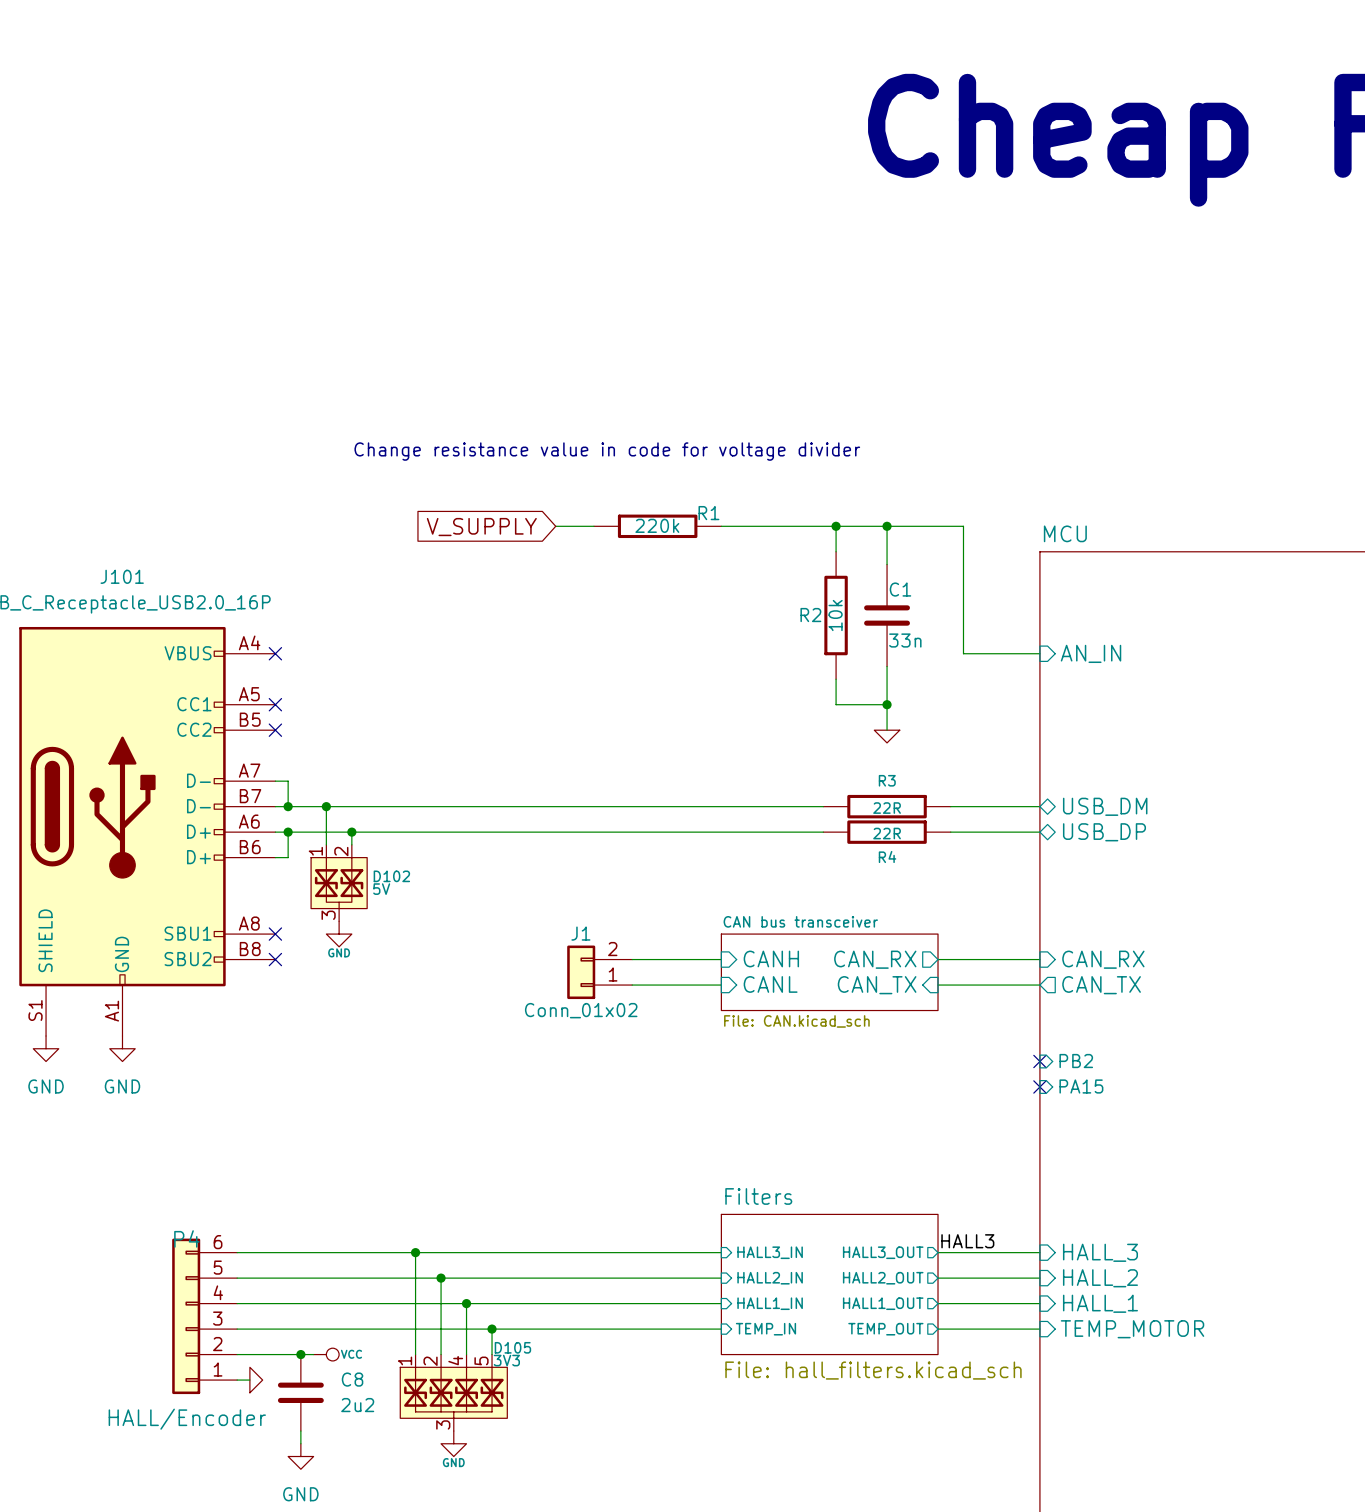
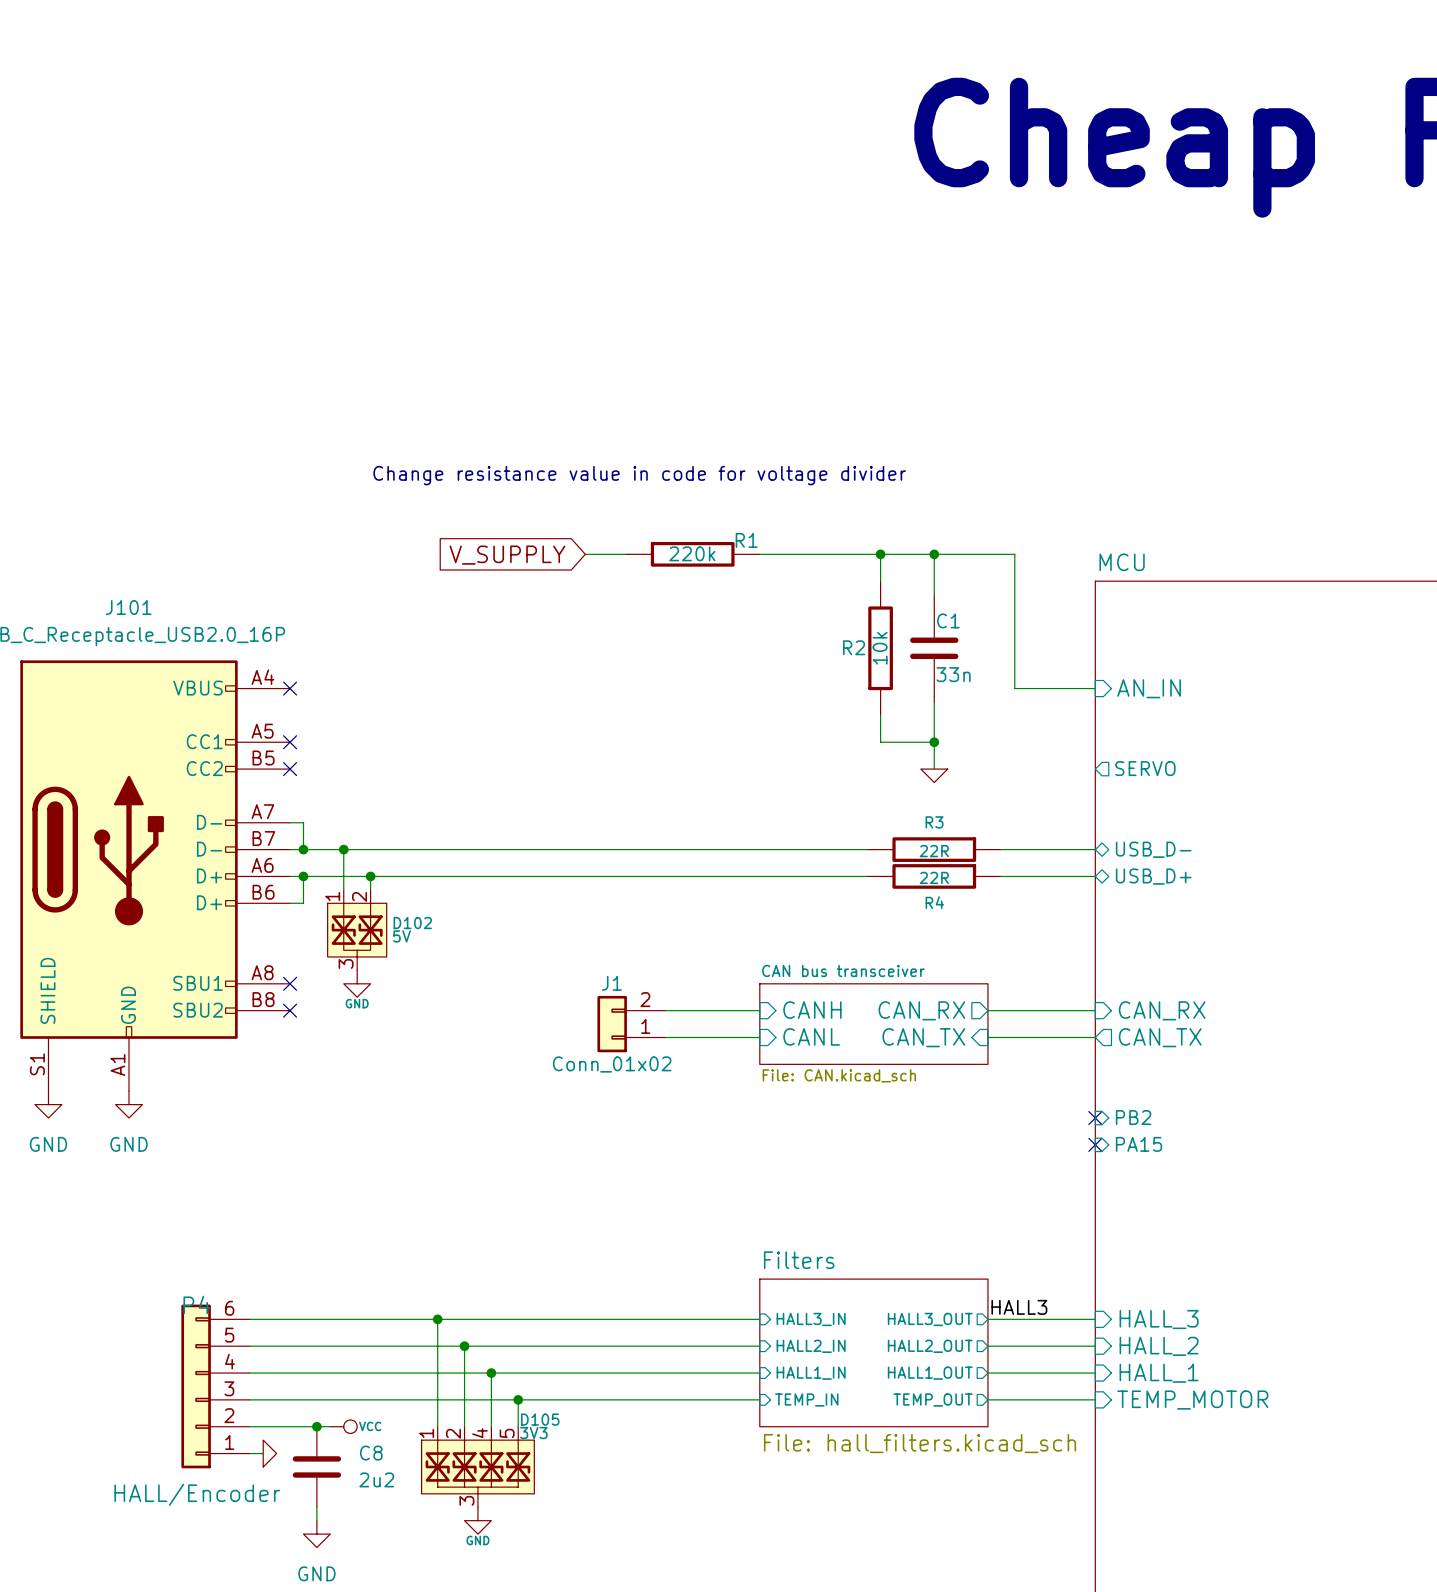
sheet pin: none -> SERVO (1145, 768)
sheet pin: USB_DM (1105, 806) -> USB_D- (1153, 849)
sheet pin: USB_DP (1104, 832) -> USB_D+ (1153, 876)

